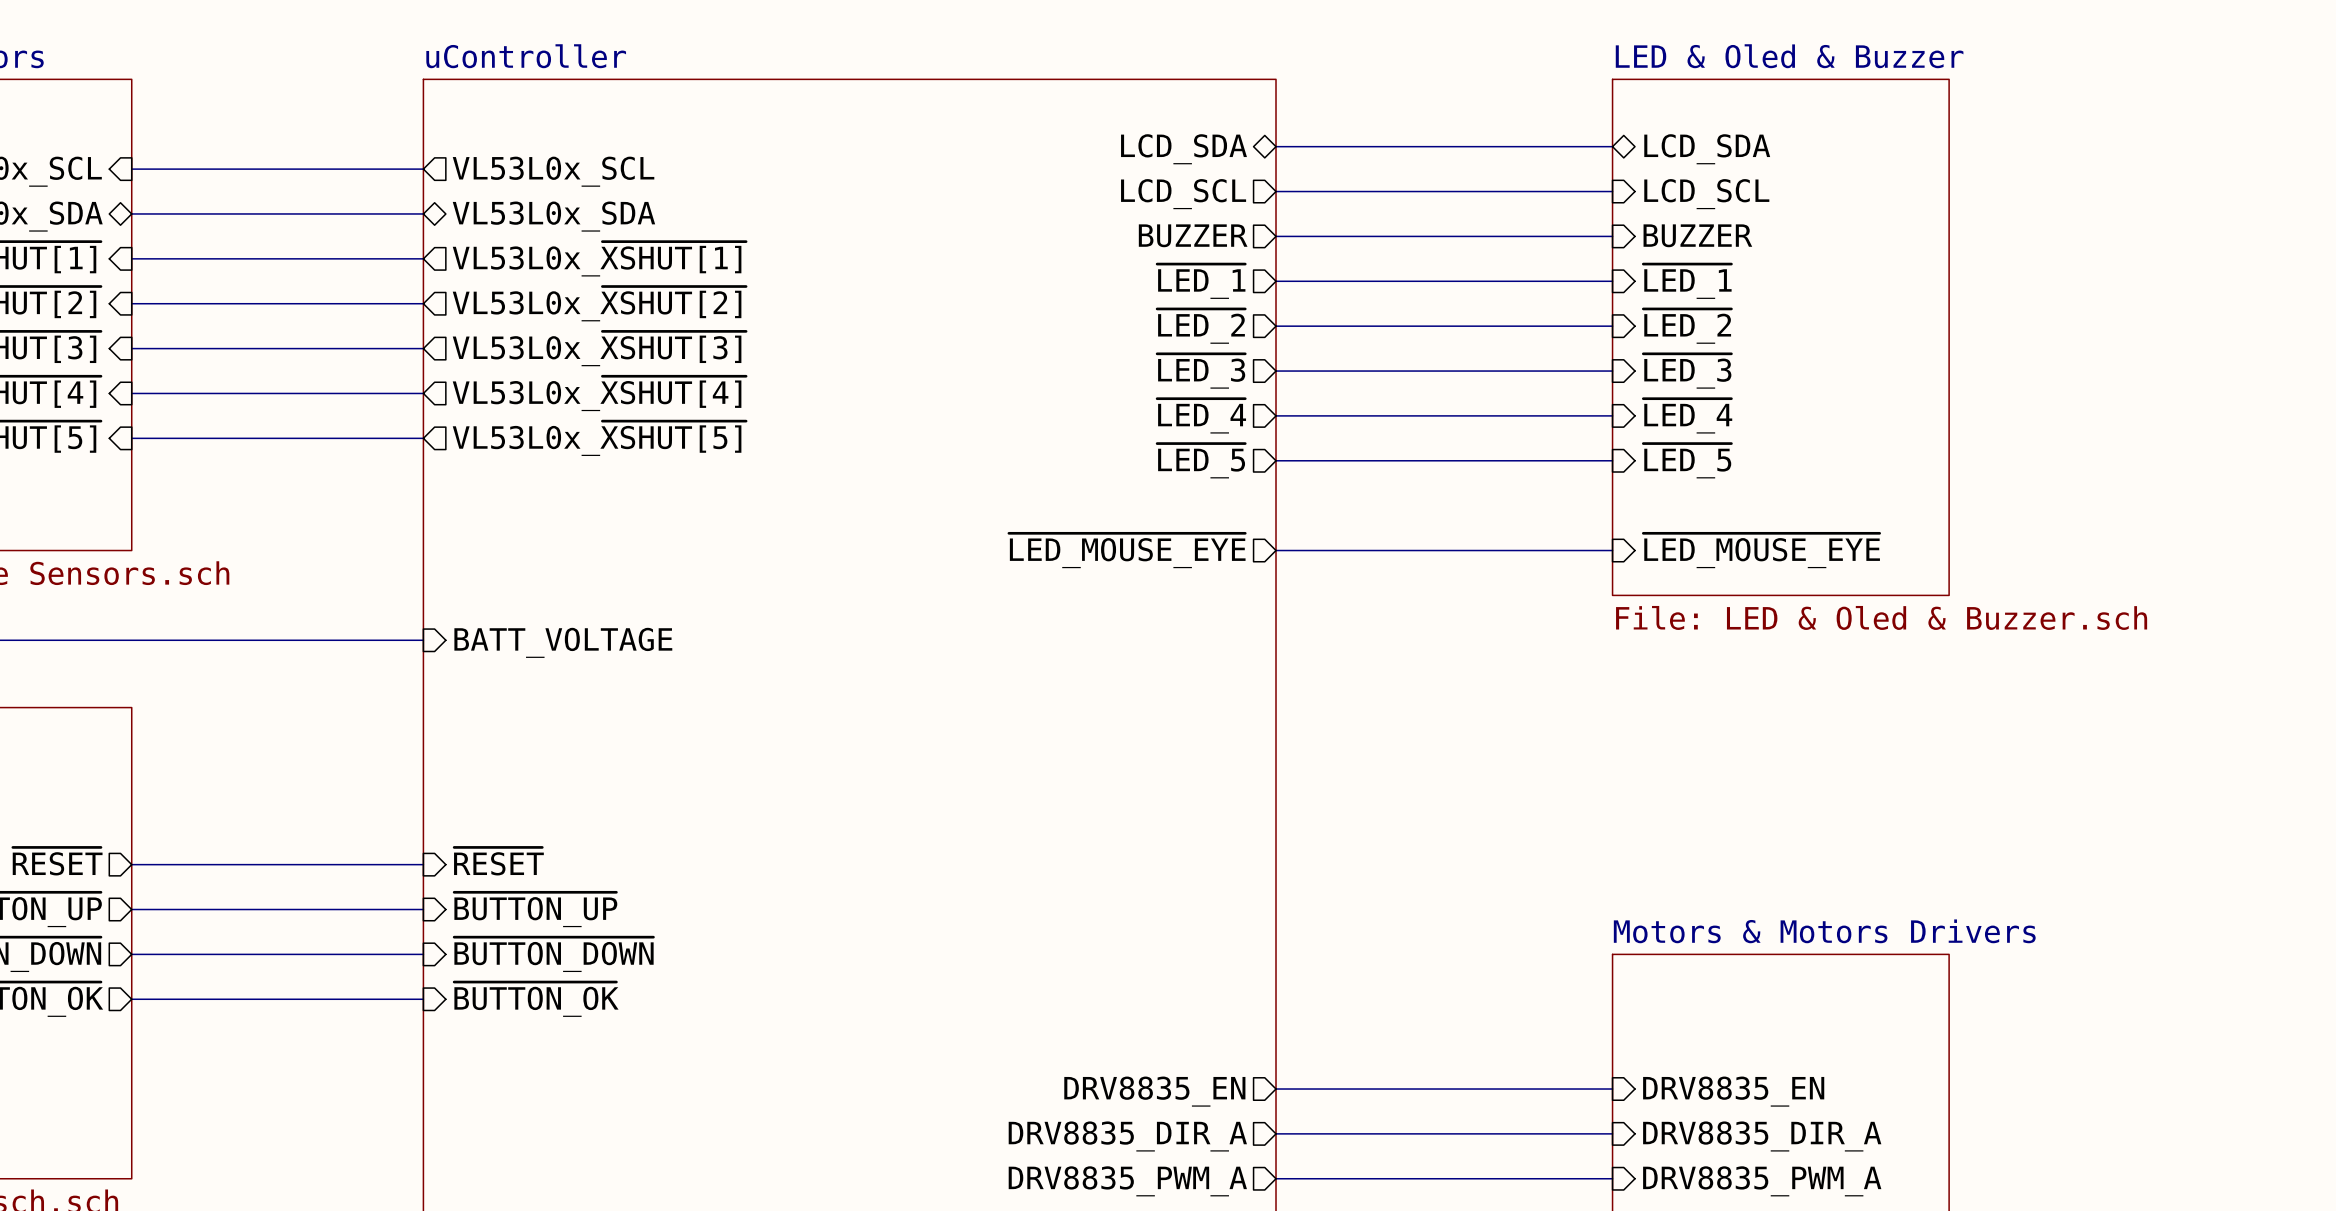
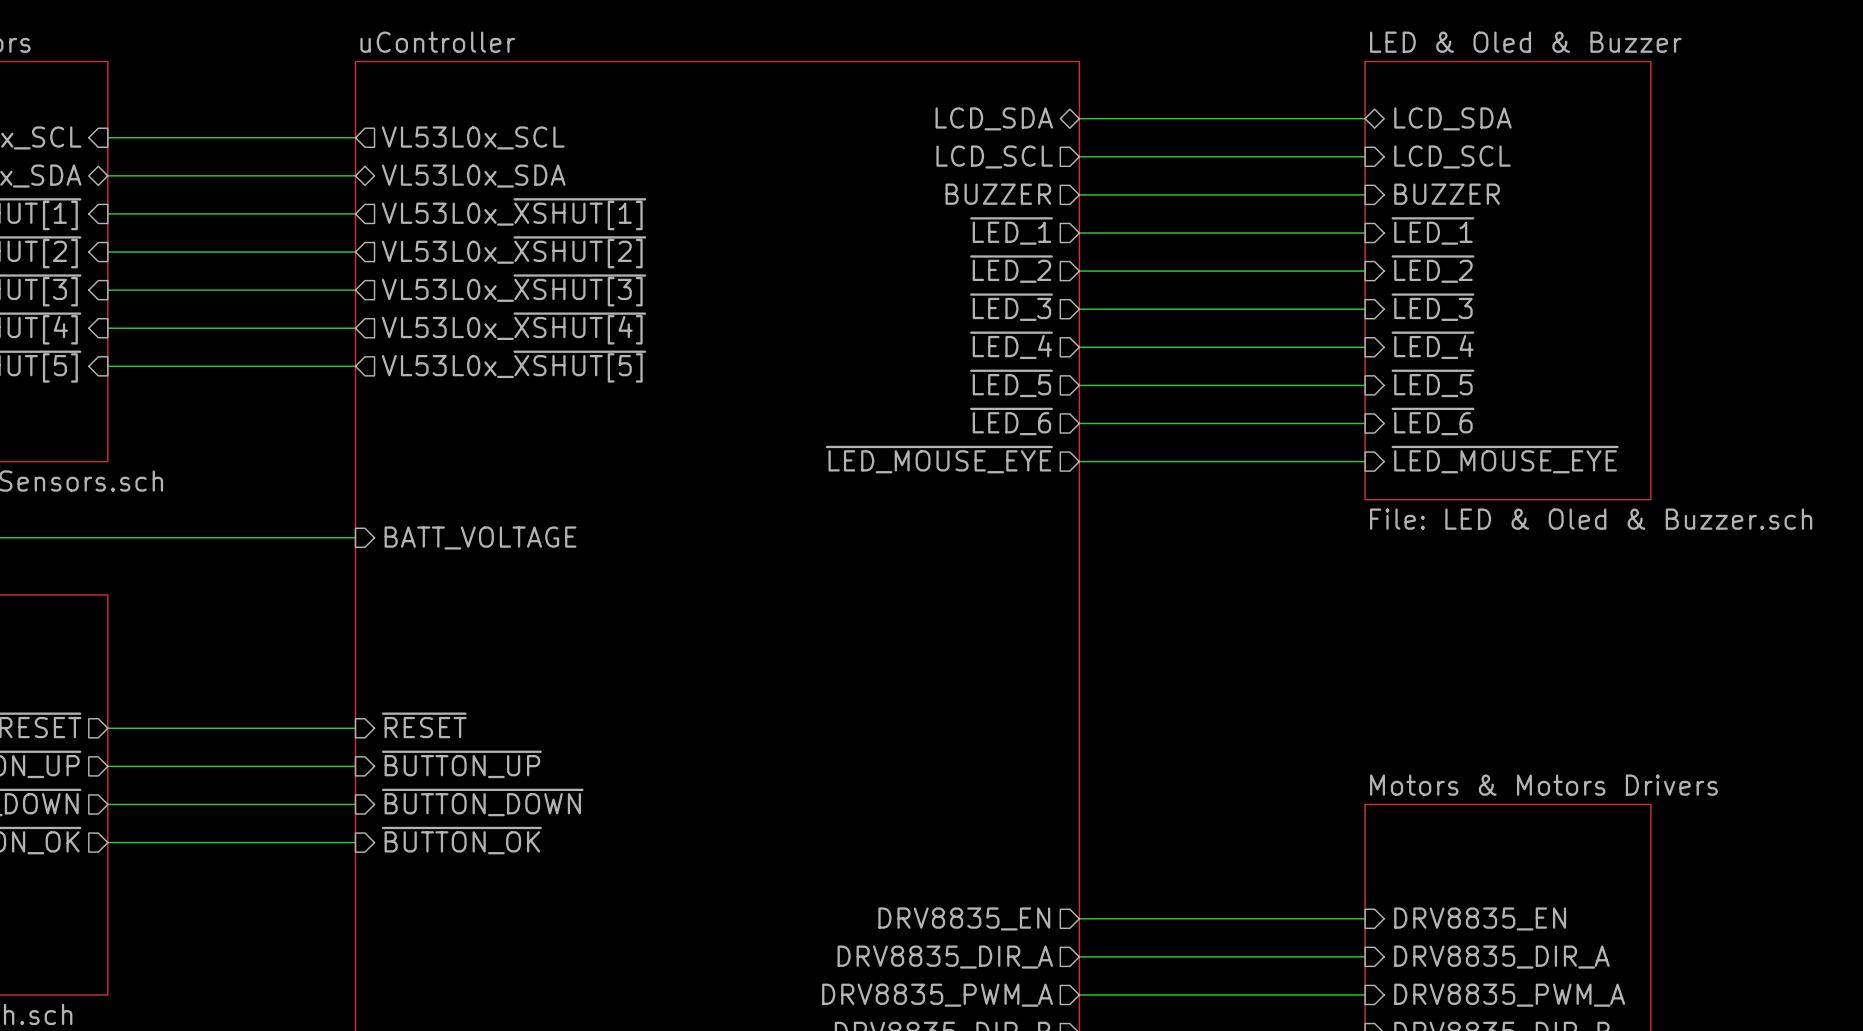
sheet pin: none -> ~{LED_6} (1011, 421)
wire: none -> (1079, 423) (1365, 423)
sheet pin: none -> ~{LED_6} (1432, 421)

